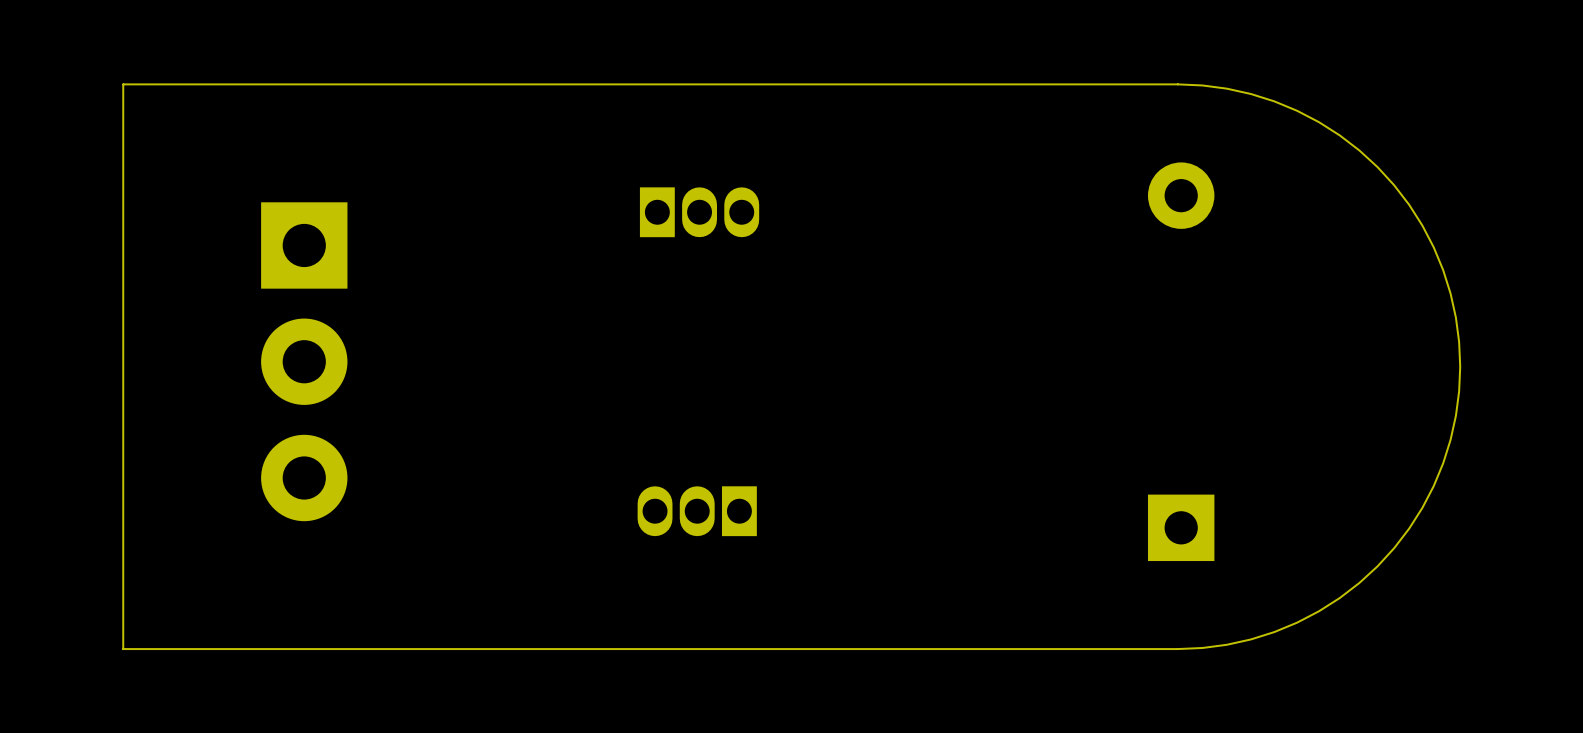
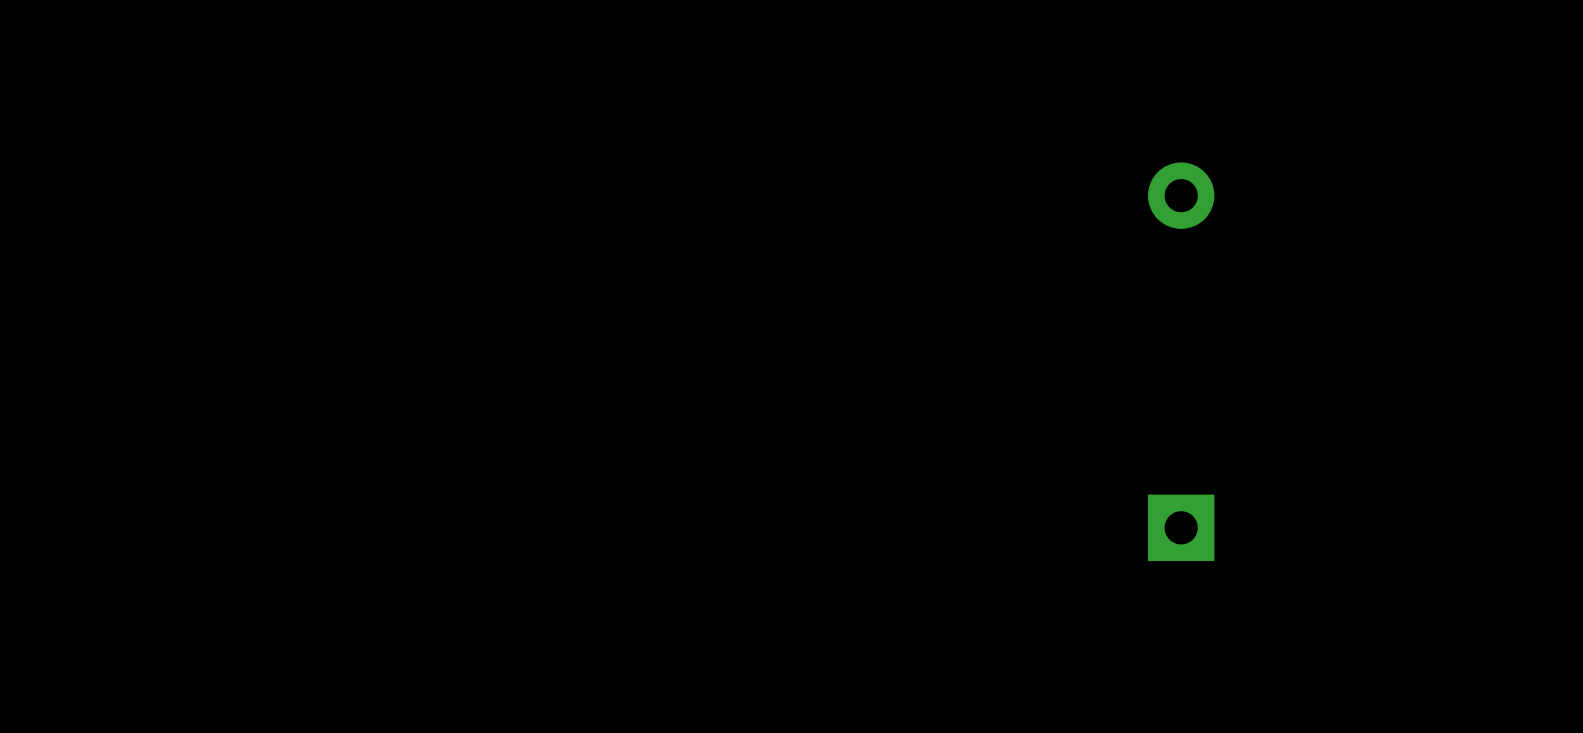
board edge: (1177, 84) (123, 84) (123, 649) (1177, 649) (1226, 644) (1250, 639) (1274, 632) (1319, 611) (1359, 583) (1394, 548) (1422, 507) (1443, 463) (1455, 415) (1459, 391) (1459, 342) (1450, 293) (1433, 247) (1409, 204) (1377, 167) (1359, 150) (1319, 122) (1274, 101) (1226, 88) (1177, 84) -> none
part: (699, 212) -> none
part: (304, 361) -> none
part: (697, 511) -> none

